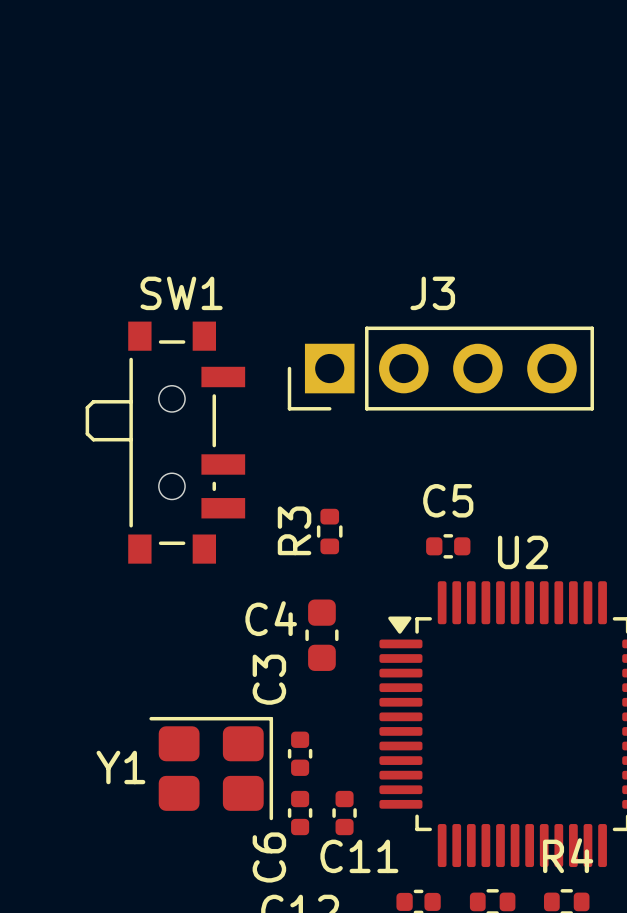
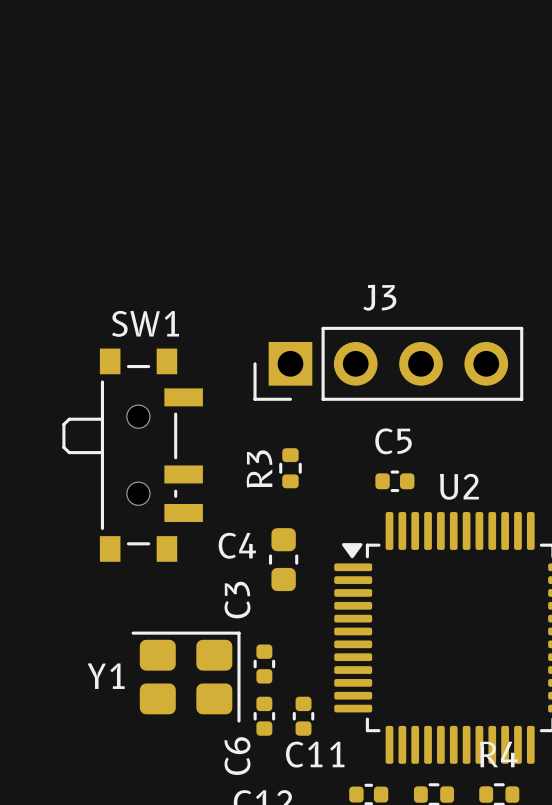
J3 position: (440, 368) -> (388, 363)
SW1 position: (165, 442) -> (132, 455)

